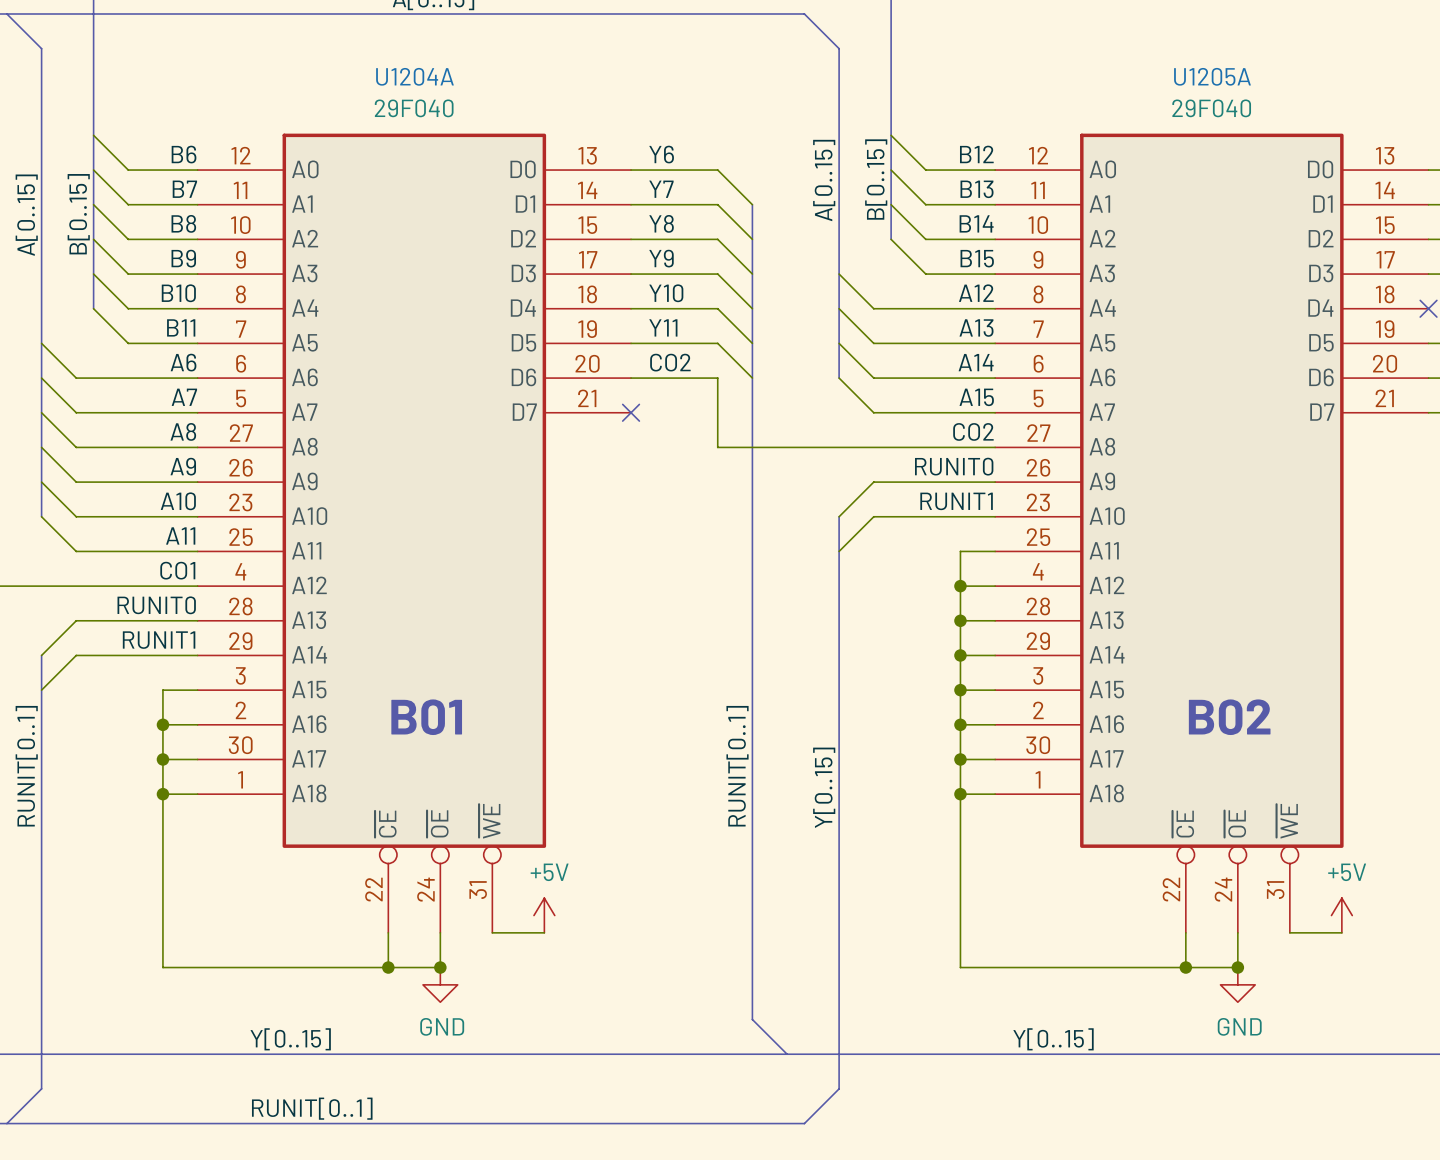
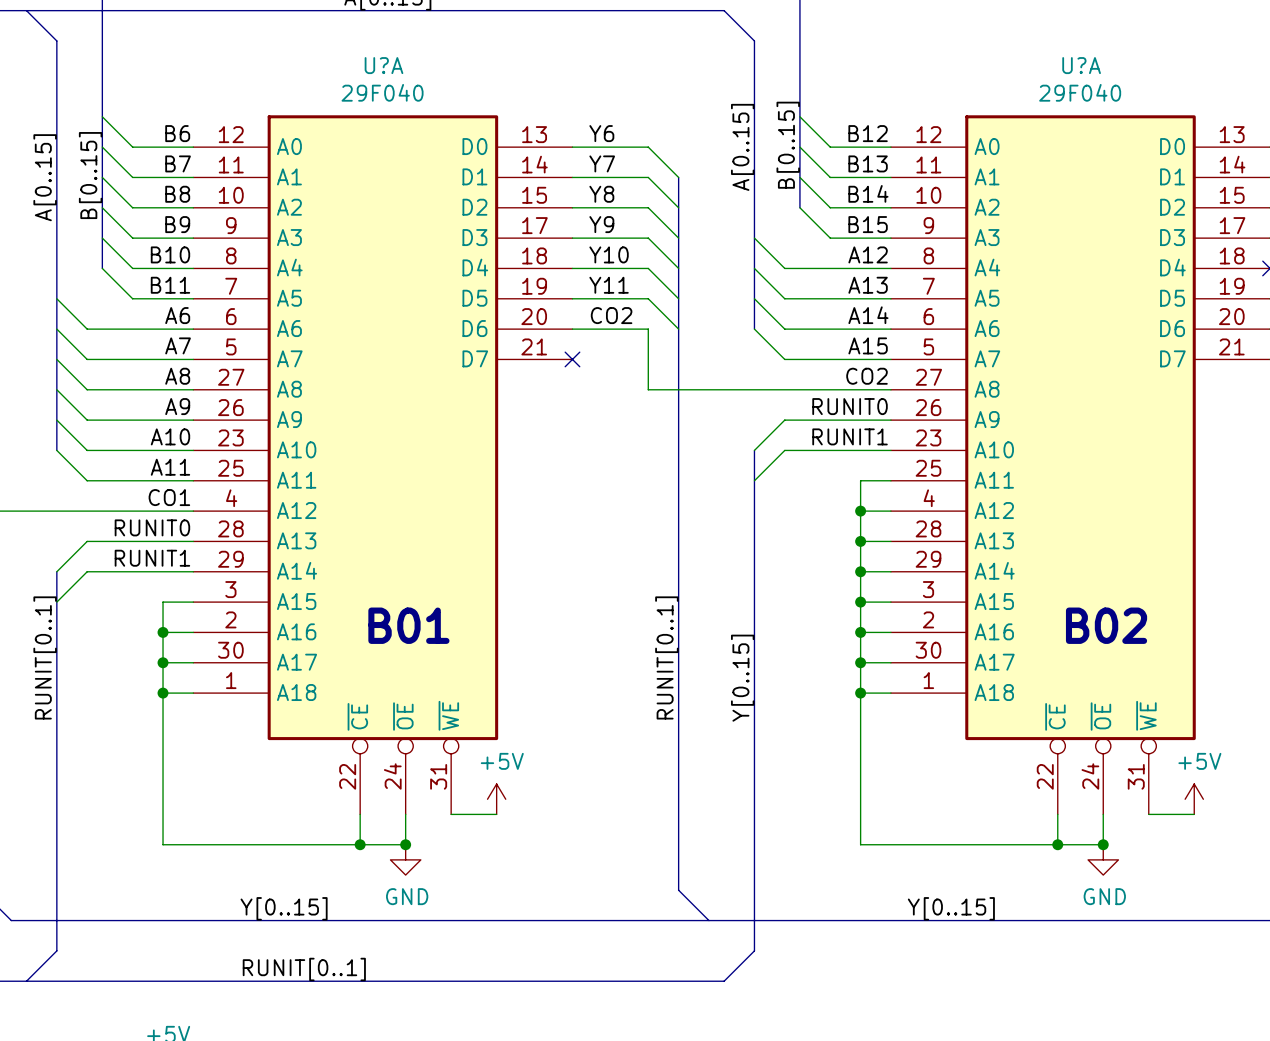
U1204A name: U1204A (414, 76) -> U?A (383, 65)
U1205A name: U1205A (1212, 76) -> U?A (1081, 65)

